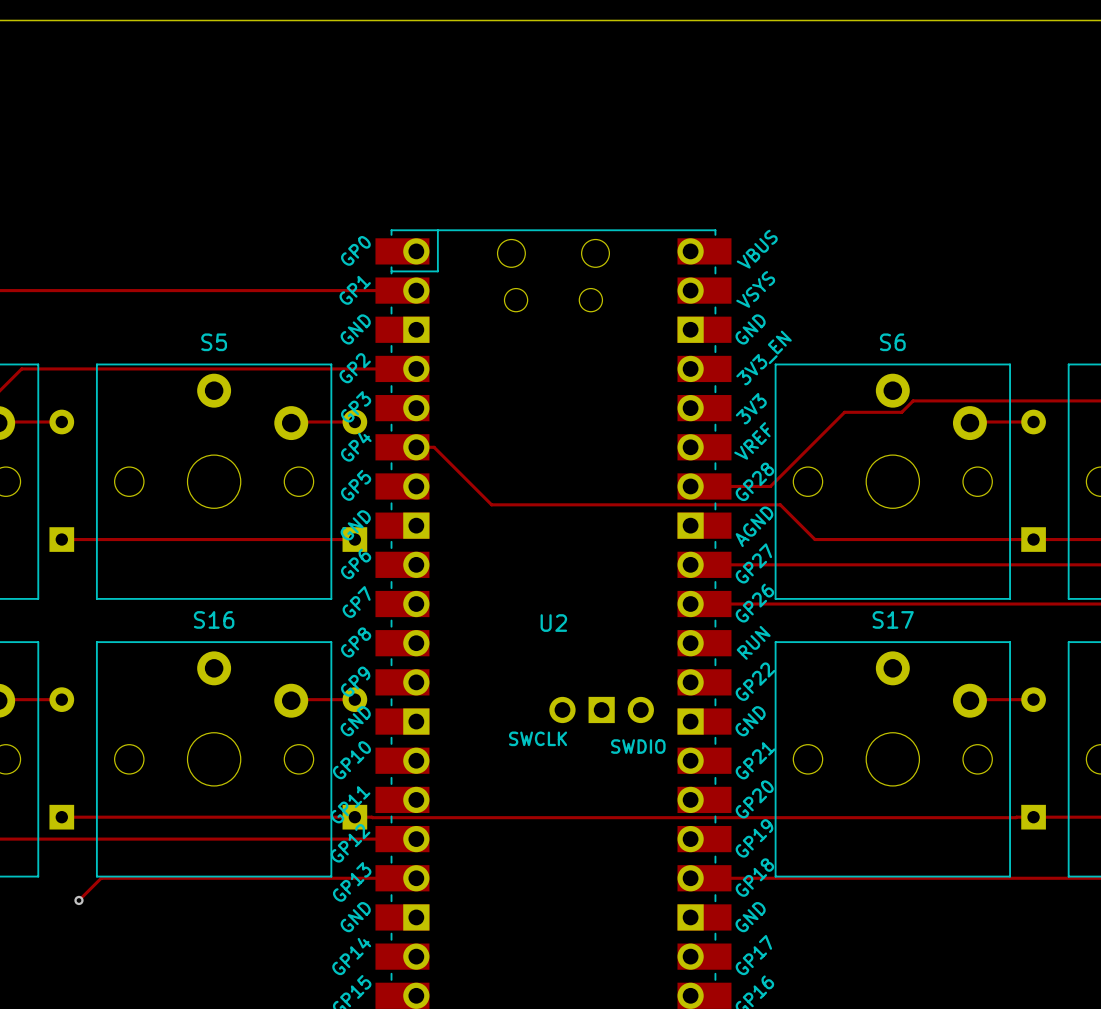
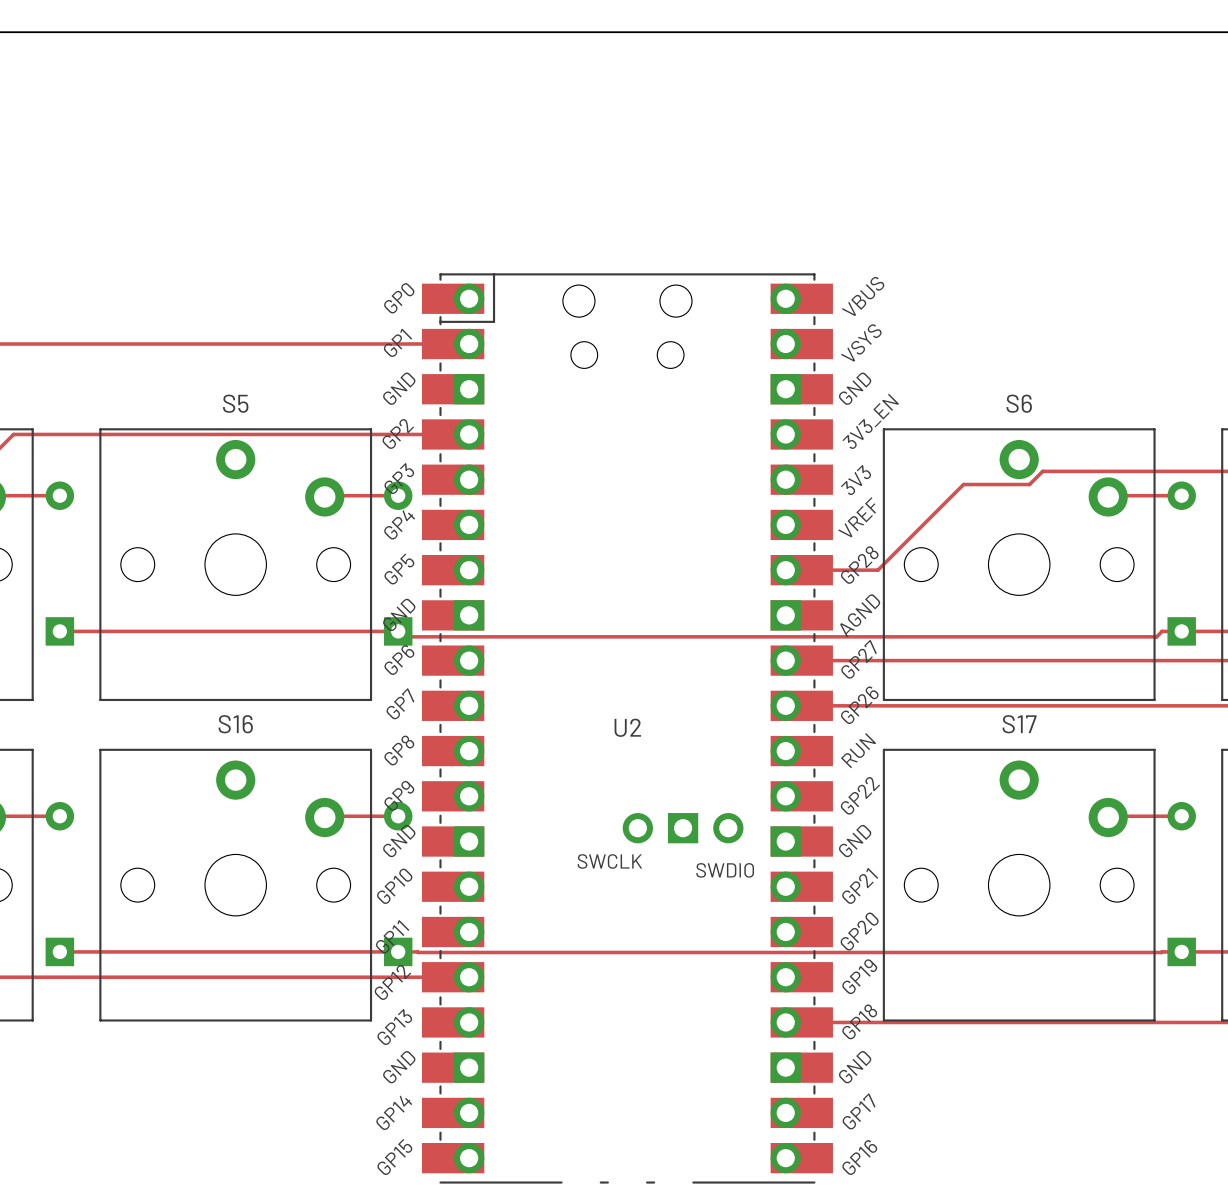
track: (416, 447) (434, 447) (491, 504) (780, 504) (815, 539) (1016, 539) -> (398, 631) (403, 636) (1156, 636) (1162, 631)
track: (416, 878) (101, 878) (78, 900) -> none
via: (78, 900) -> none

